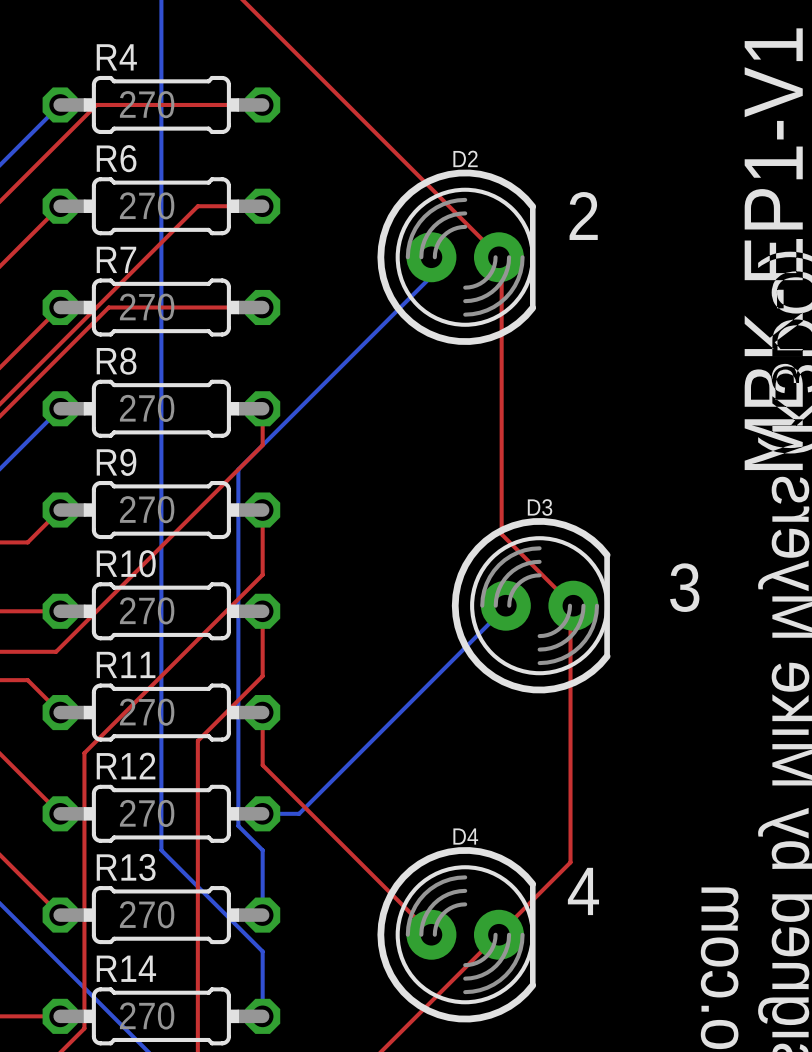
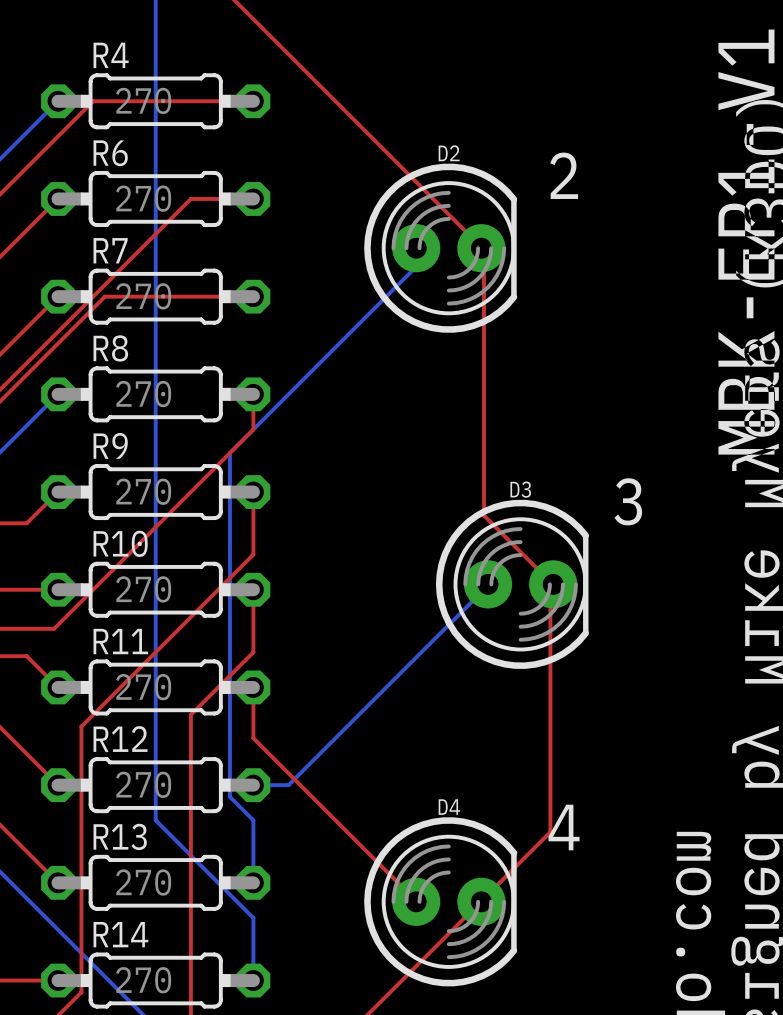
text position: 2 (583, 216) -> 2 (564, 175)
text position: 3 (684, 587) -> 3 (628, 501)
text position: 4 (583, 891) -> 4 (564, 827)

